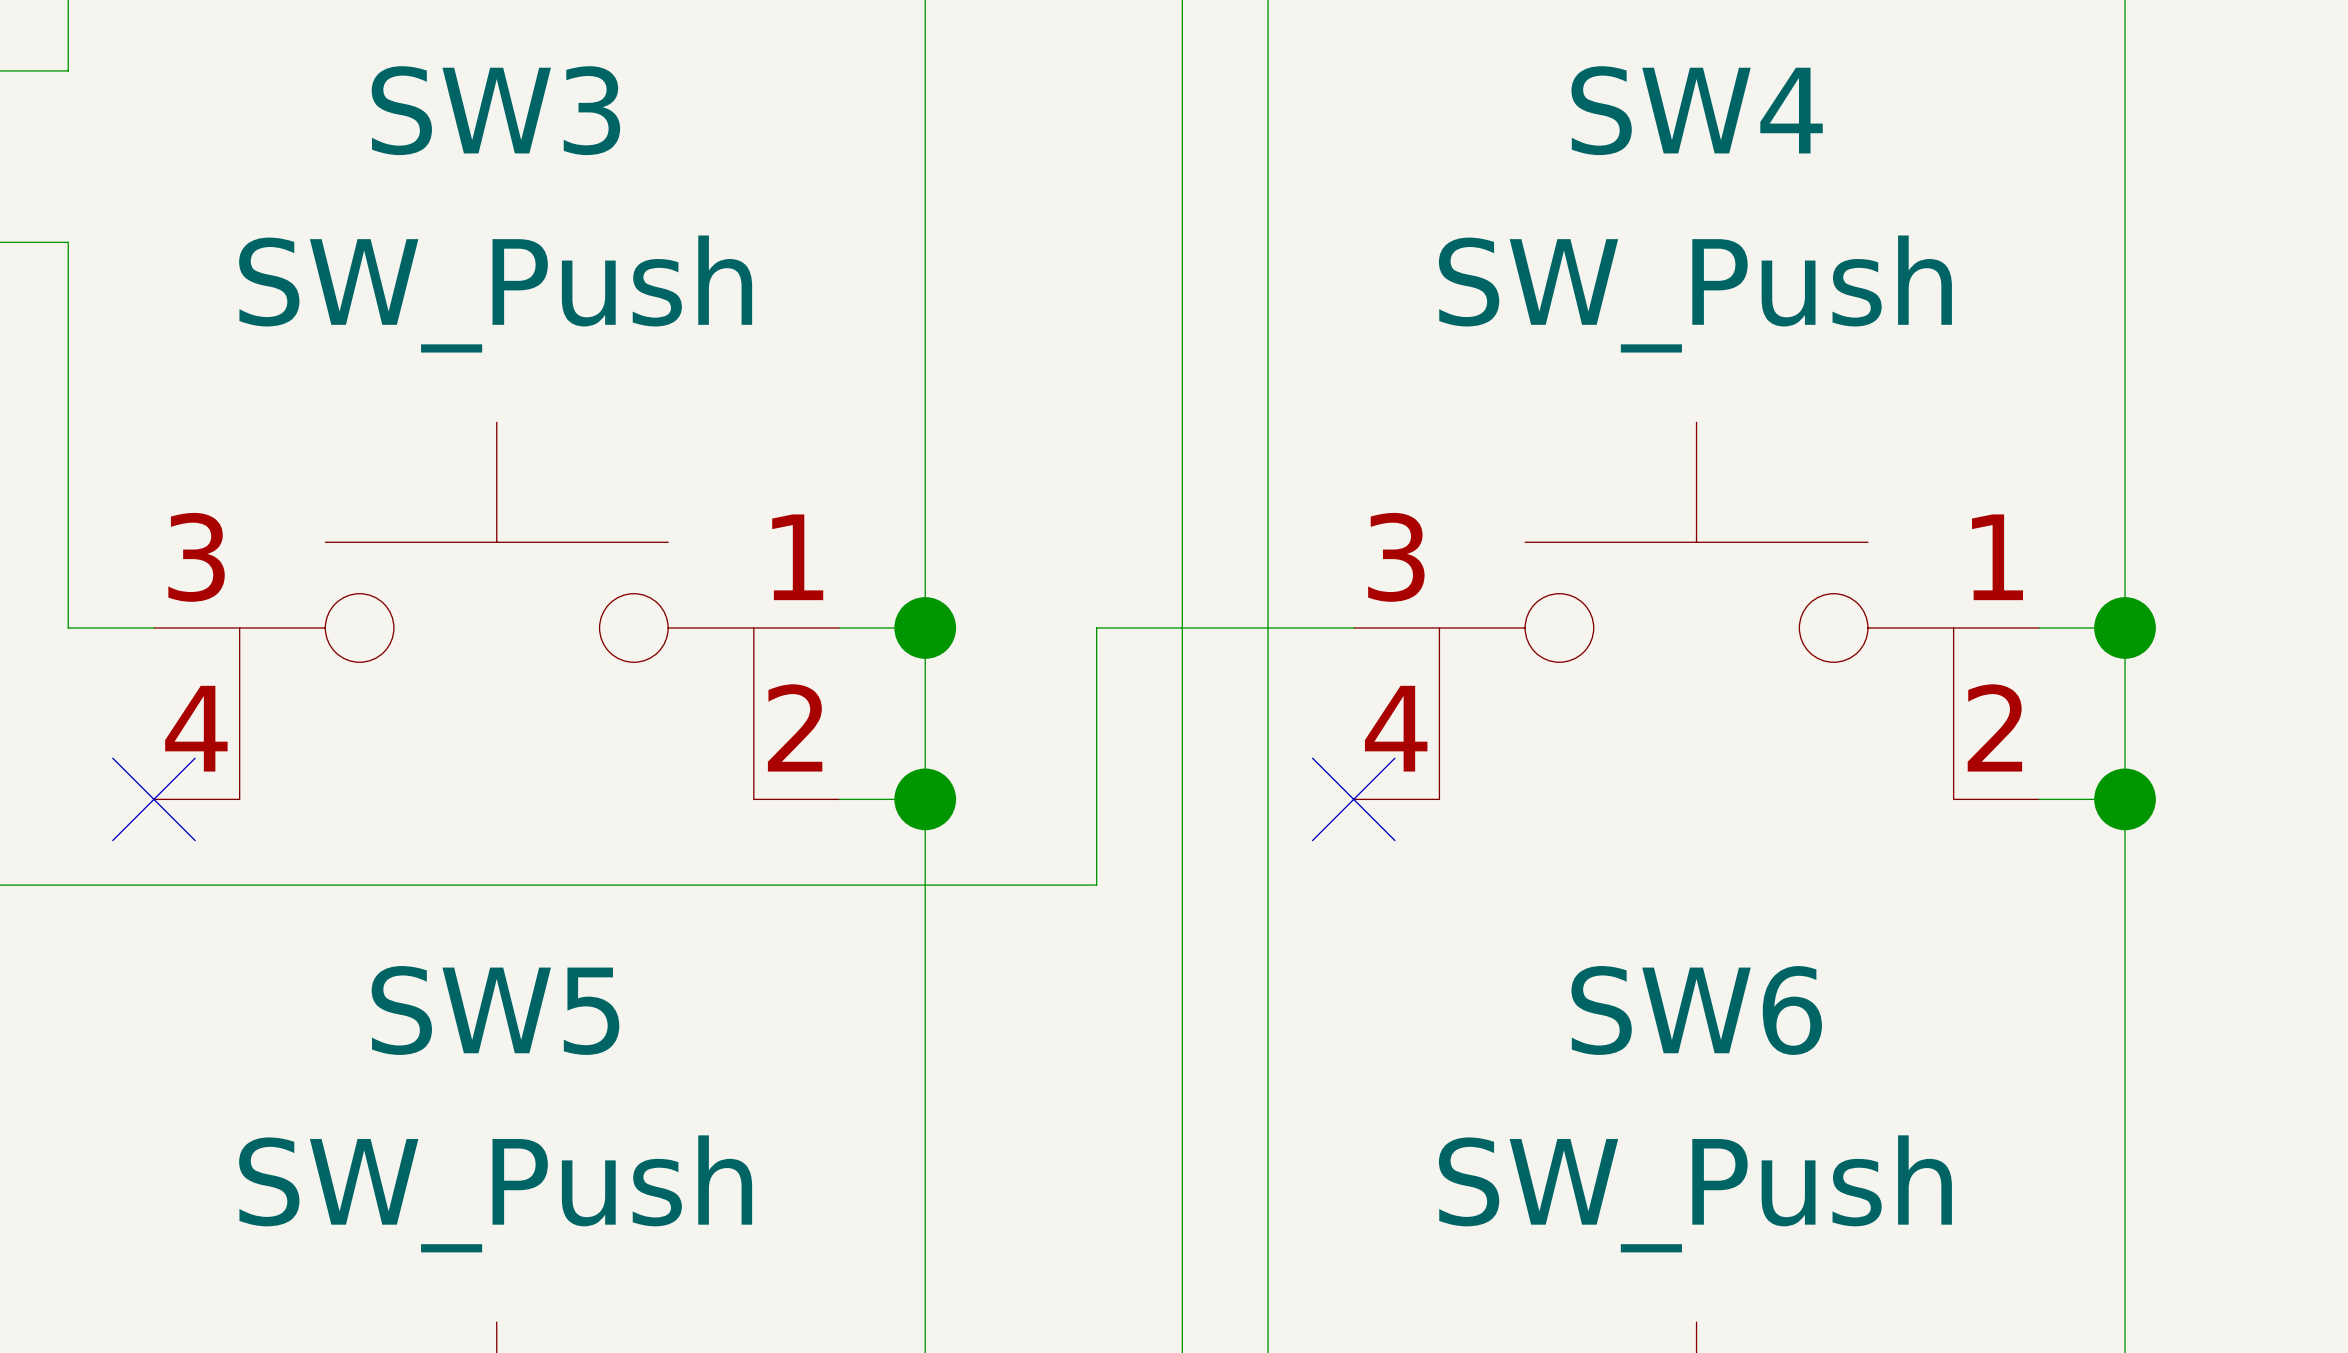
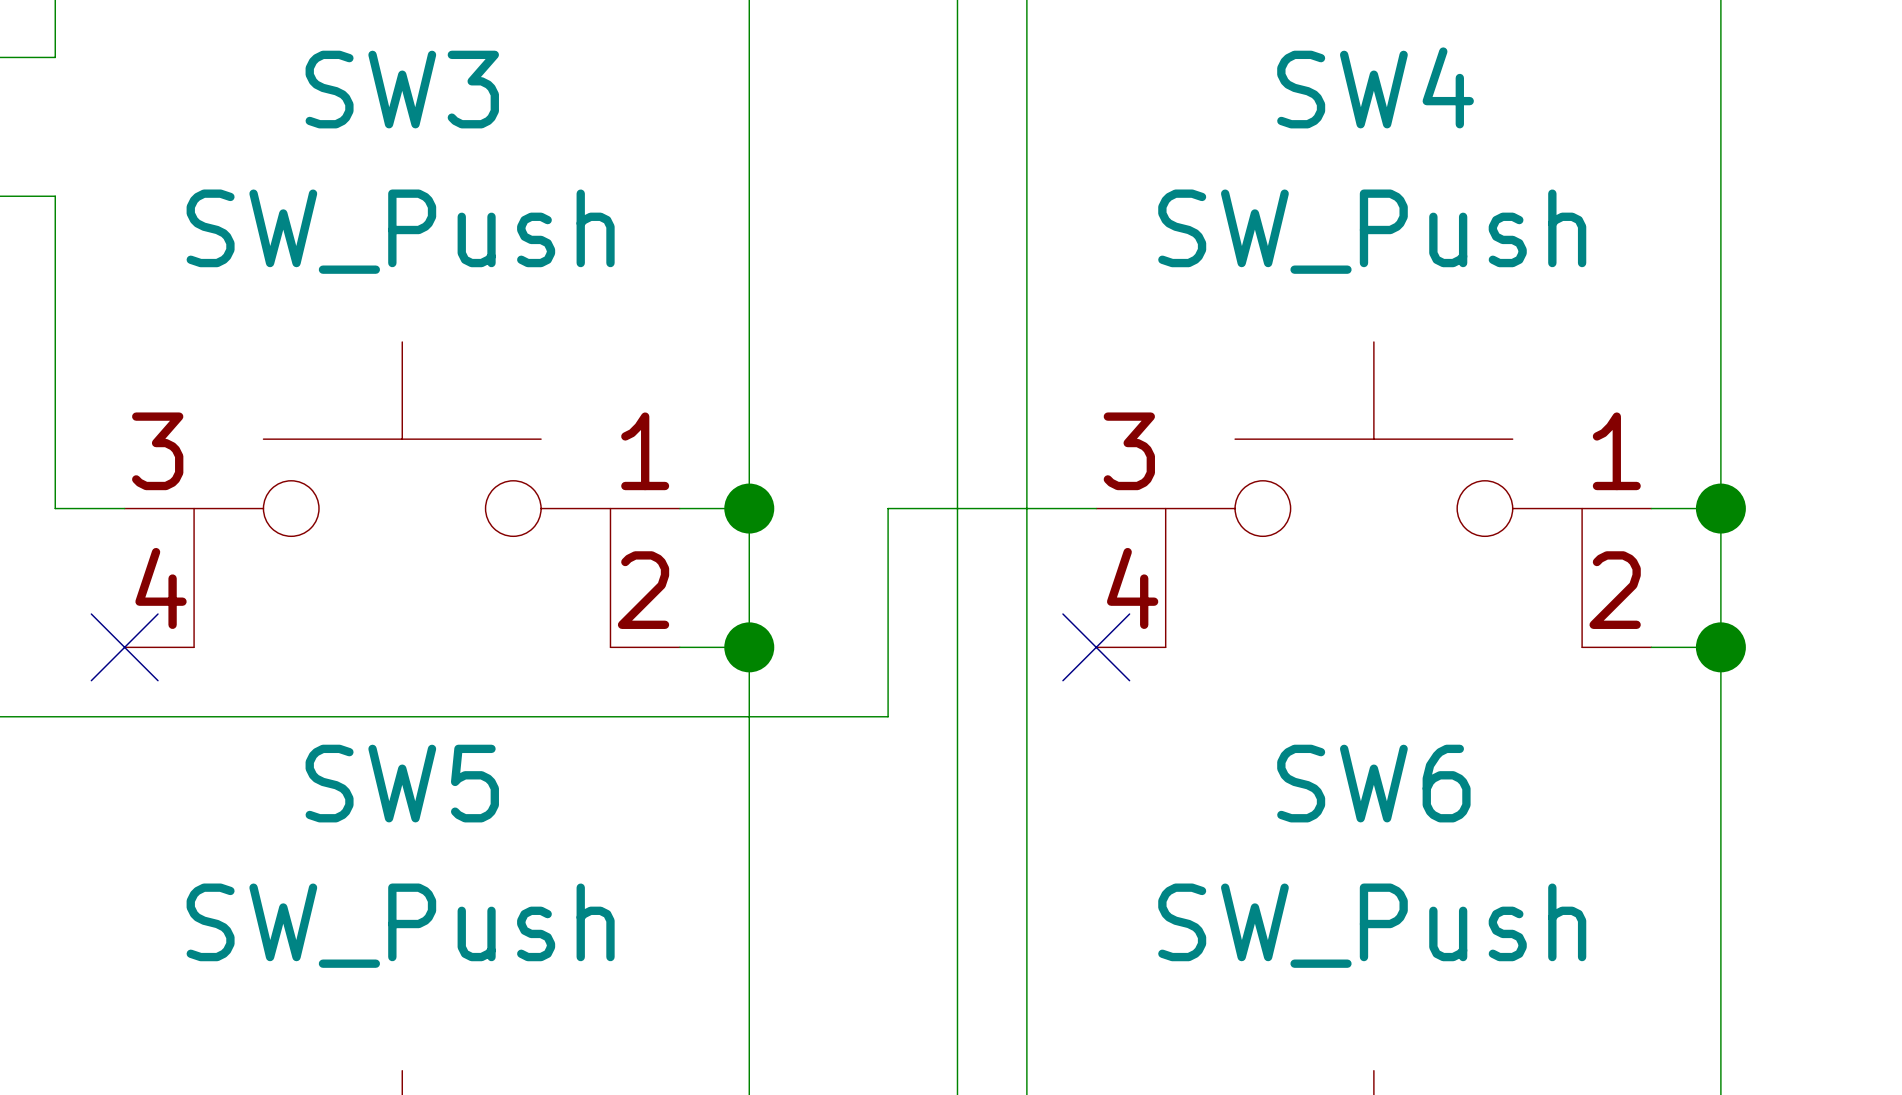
SW5 name position: SW5 (495, 1010) -> SW5 (402, 783)
SW6 name position: SW6 (1696, 1010) -> SW6 (1373, 783)
SW5 value position: SW_Push (495, 1193) -> SW_Push (400, 925)
SW6 value position: SW_Push (1695, 1193) -> SW_Push (1372, 925)

